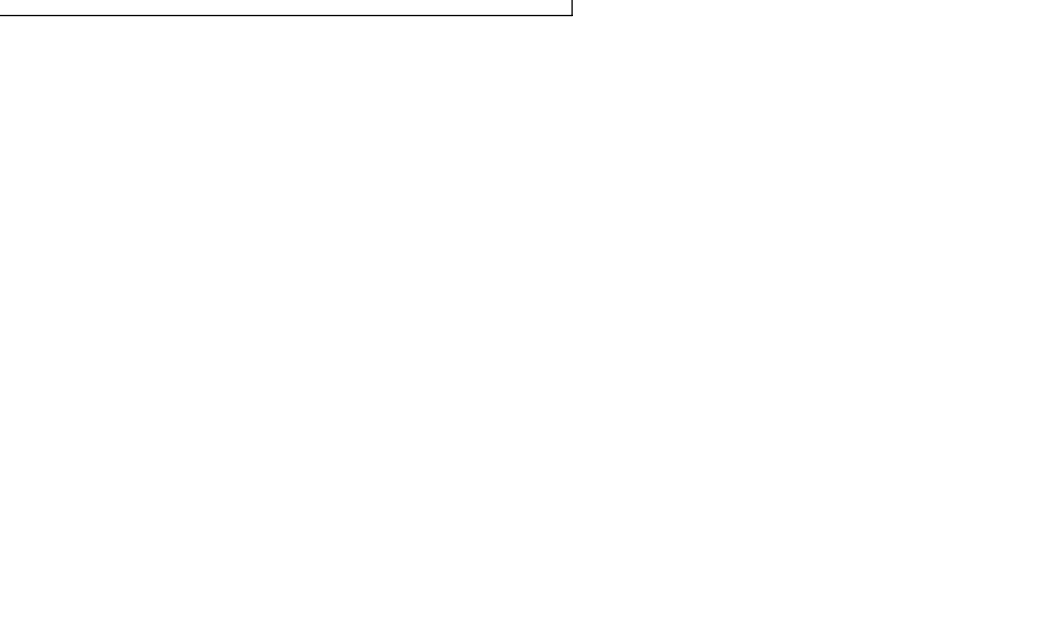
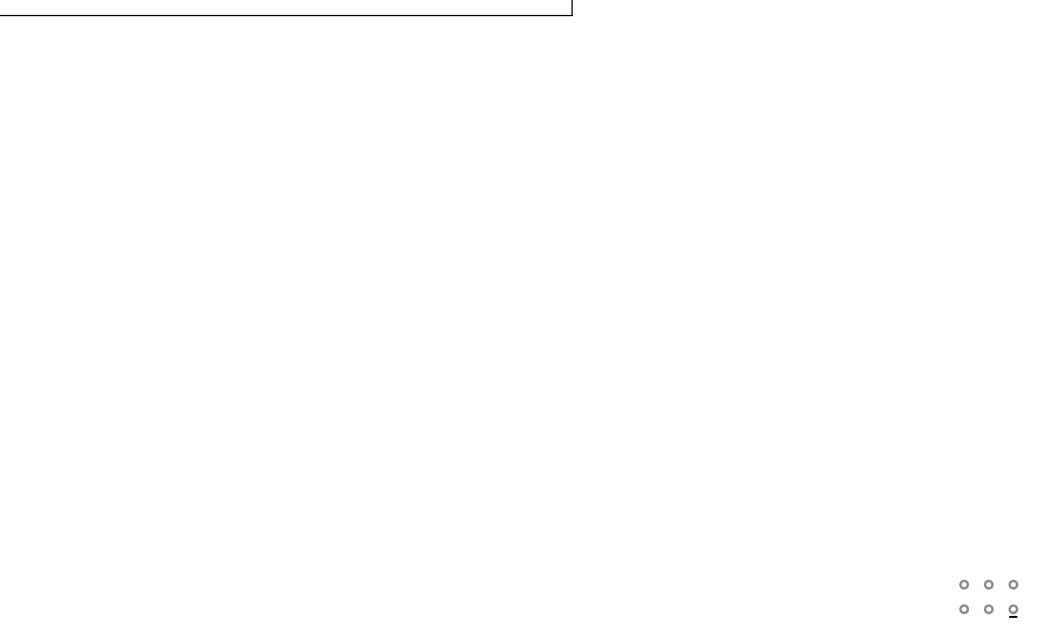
part: none -> (988, 598)

